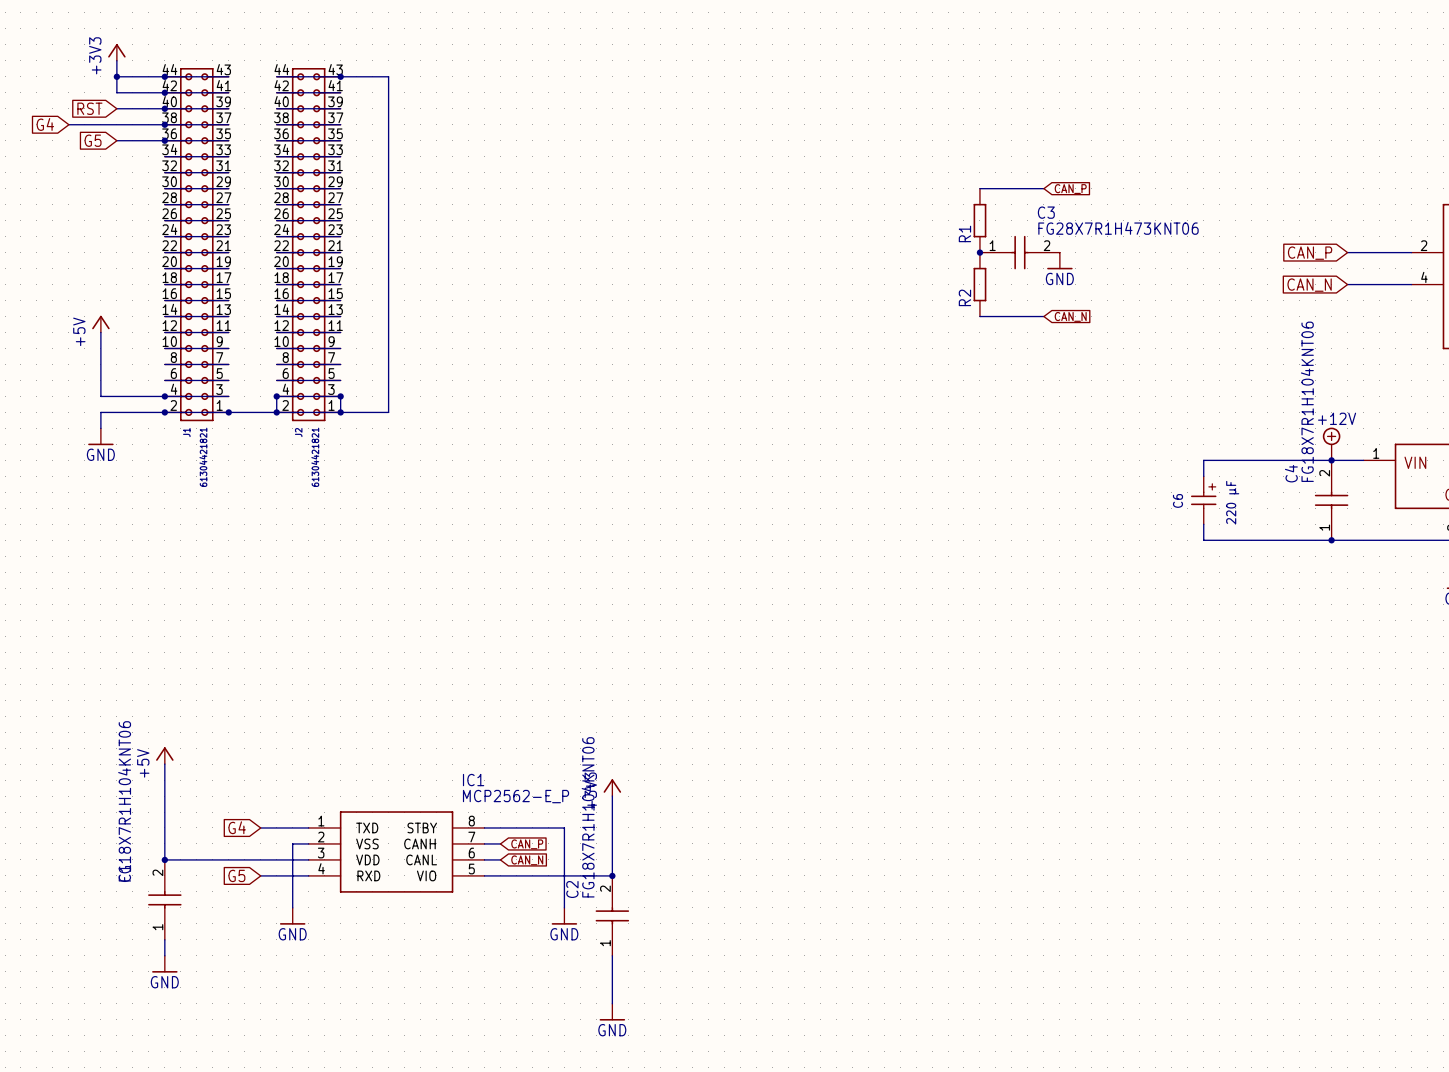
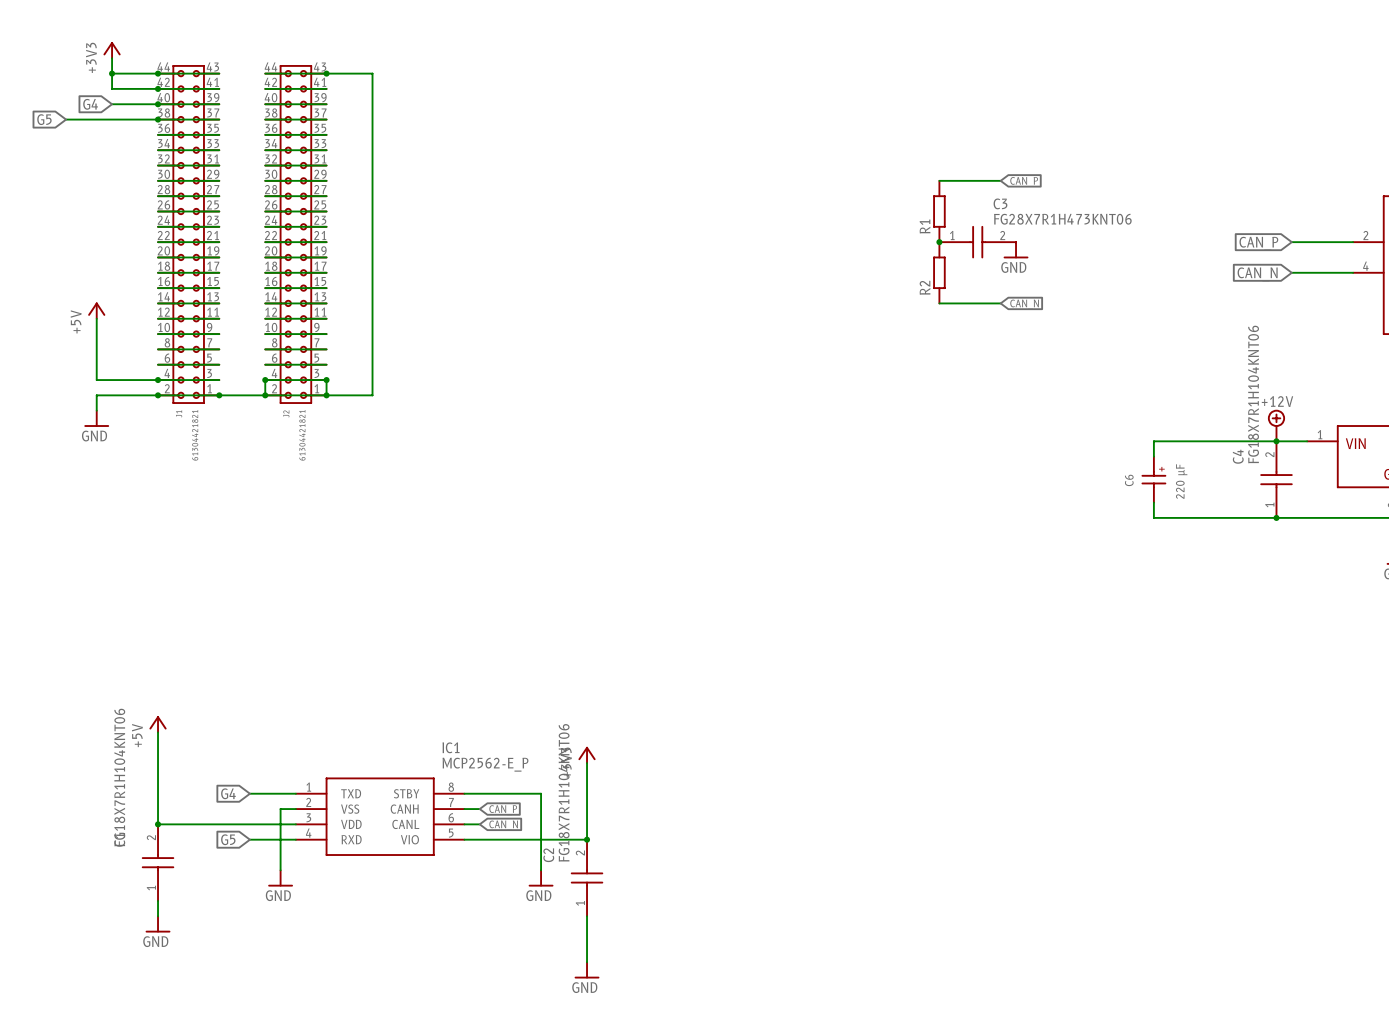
global label: RST (89, 108) -> G4 (90, 104)
global label: G4 (45, 124) -> G5 (44, 119)
global label: G5 (93, 140) -> none
wire: (116, 140) (164, 140) -> none
junction: (164, 140) -> none

